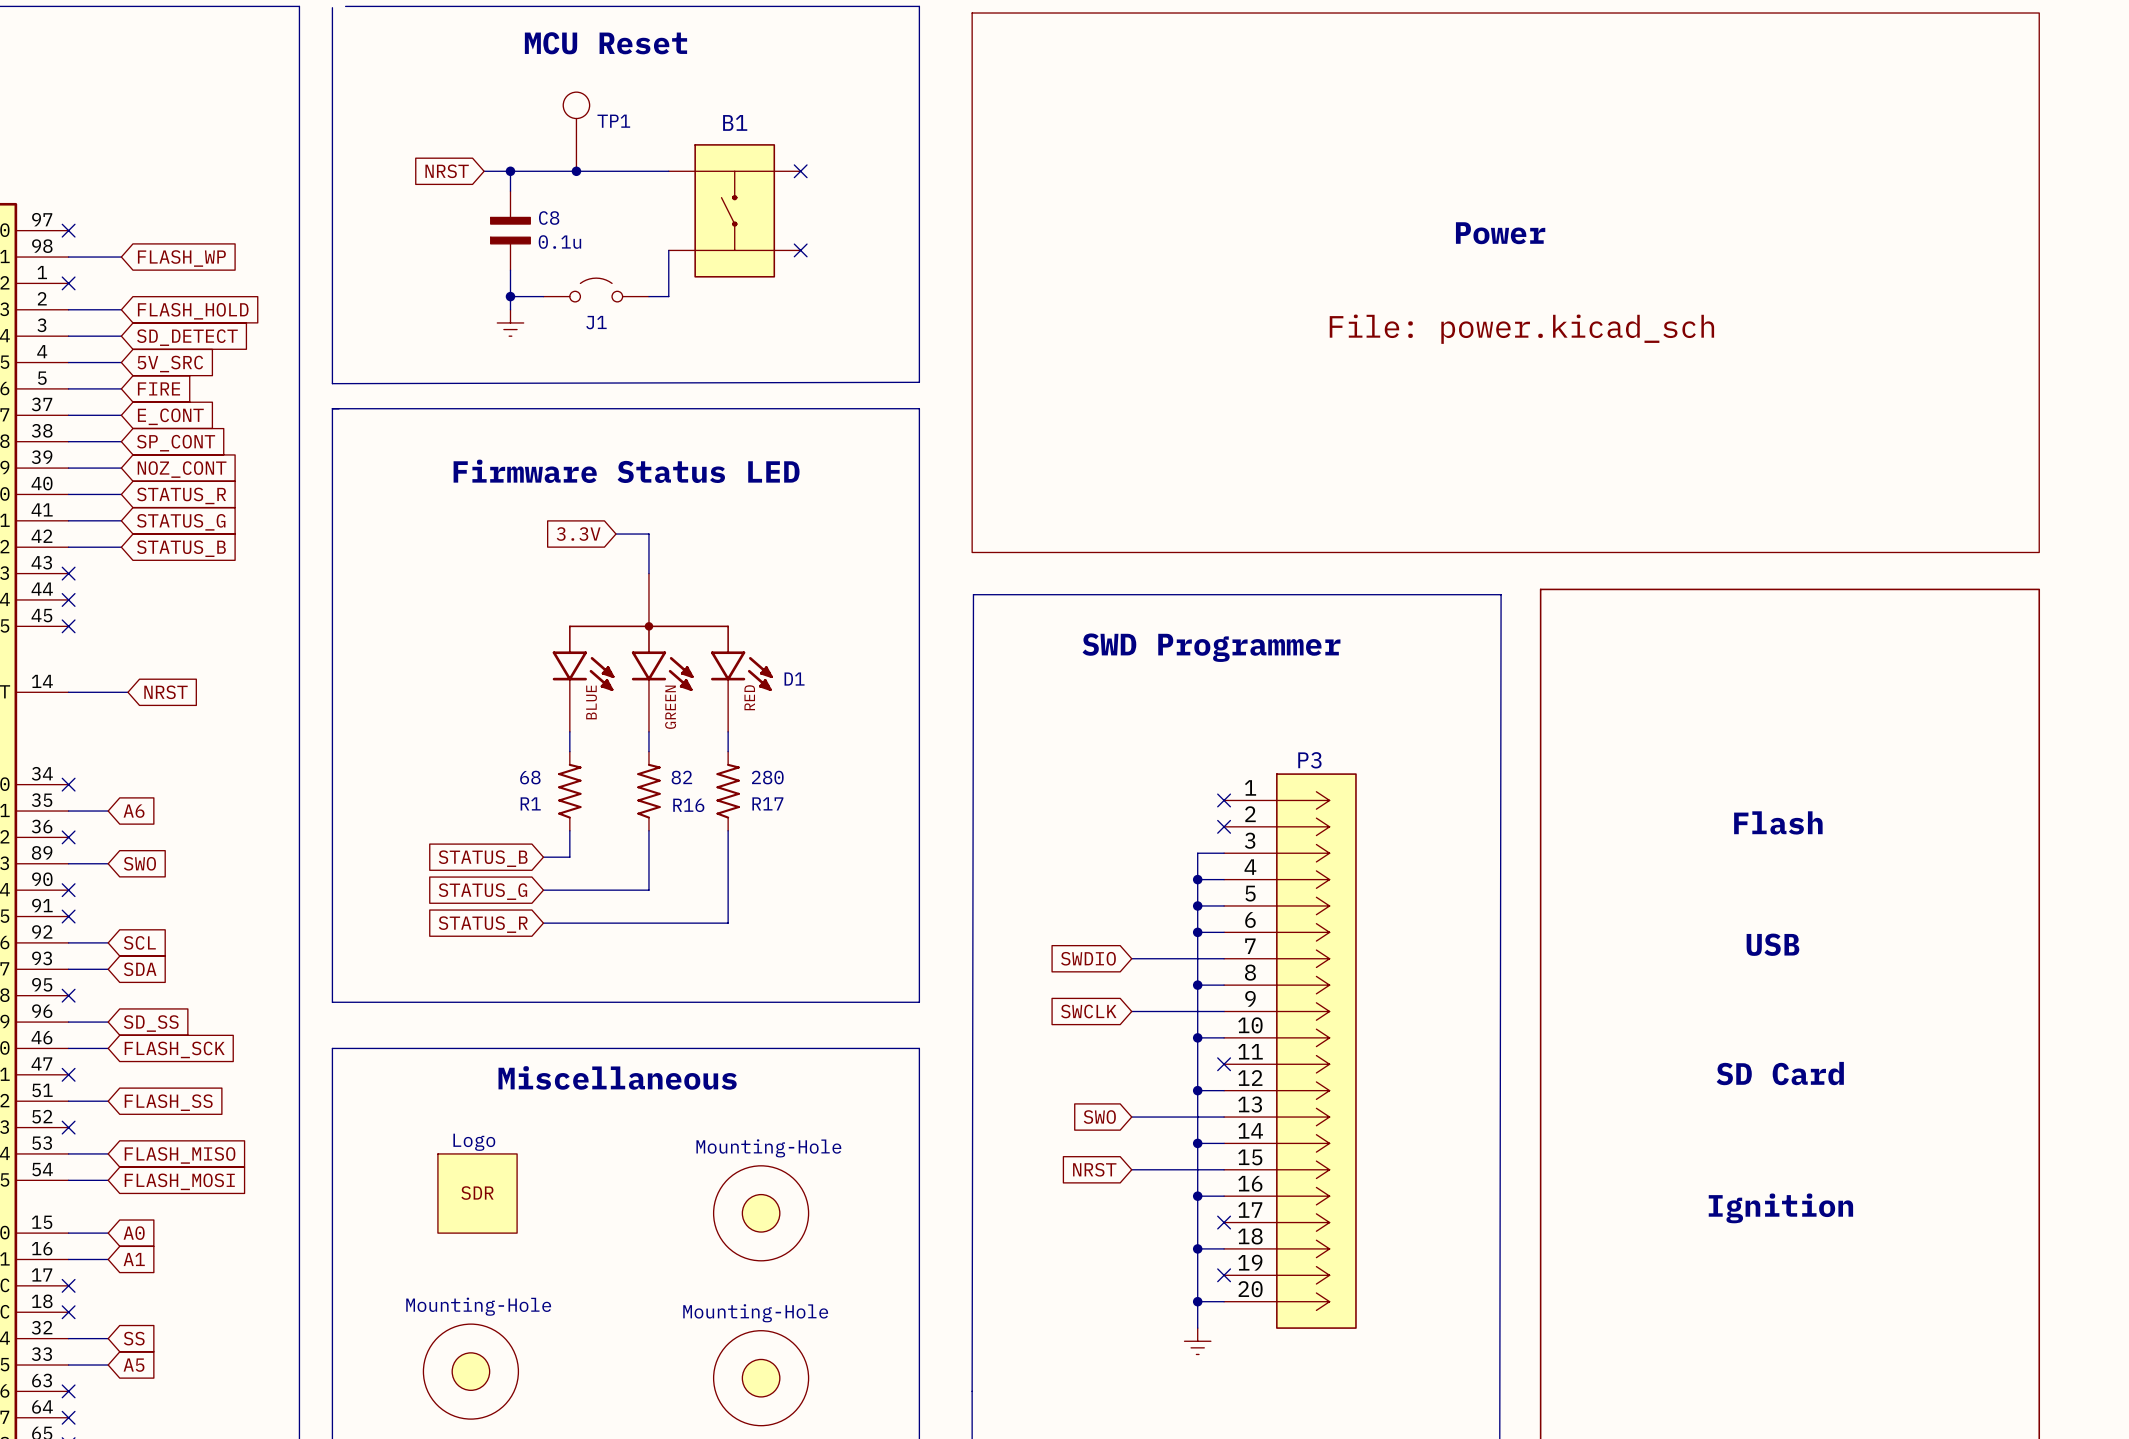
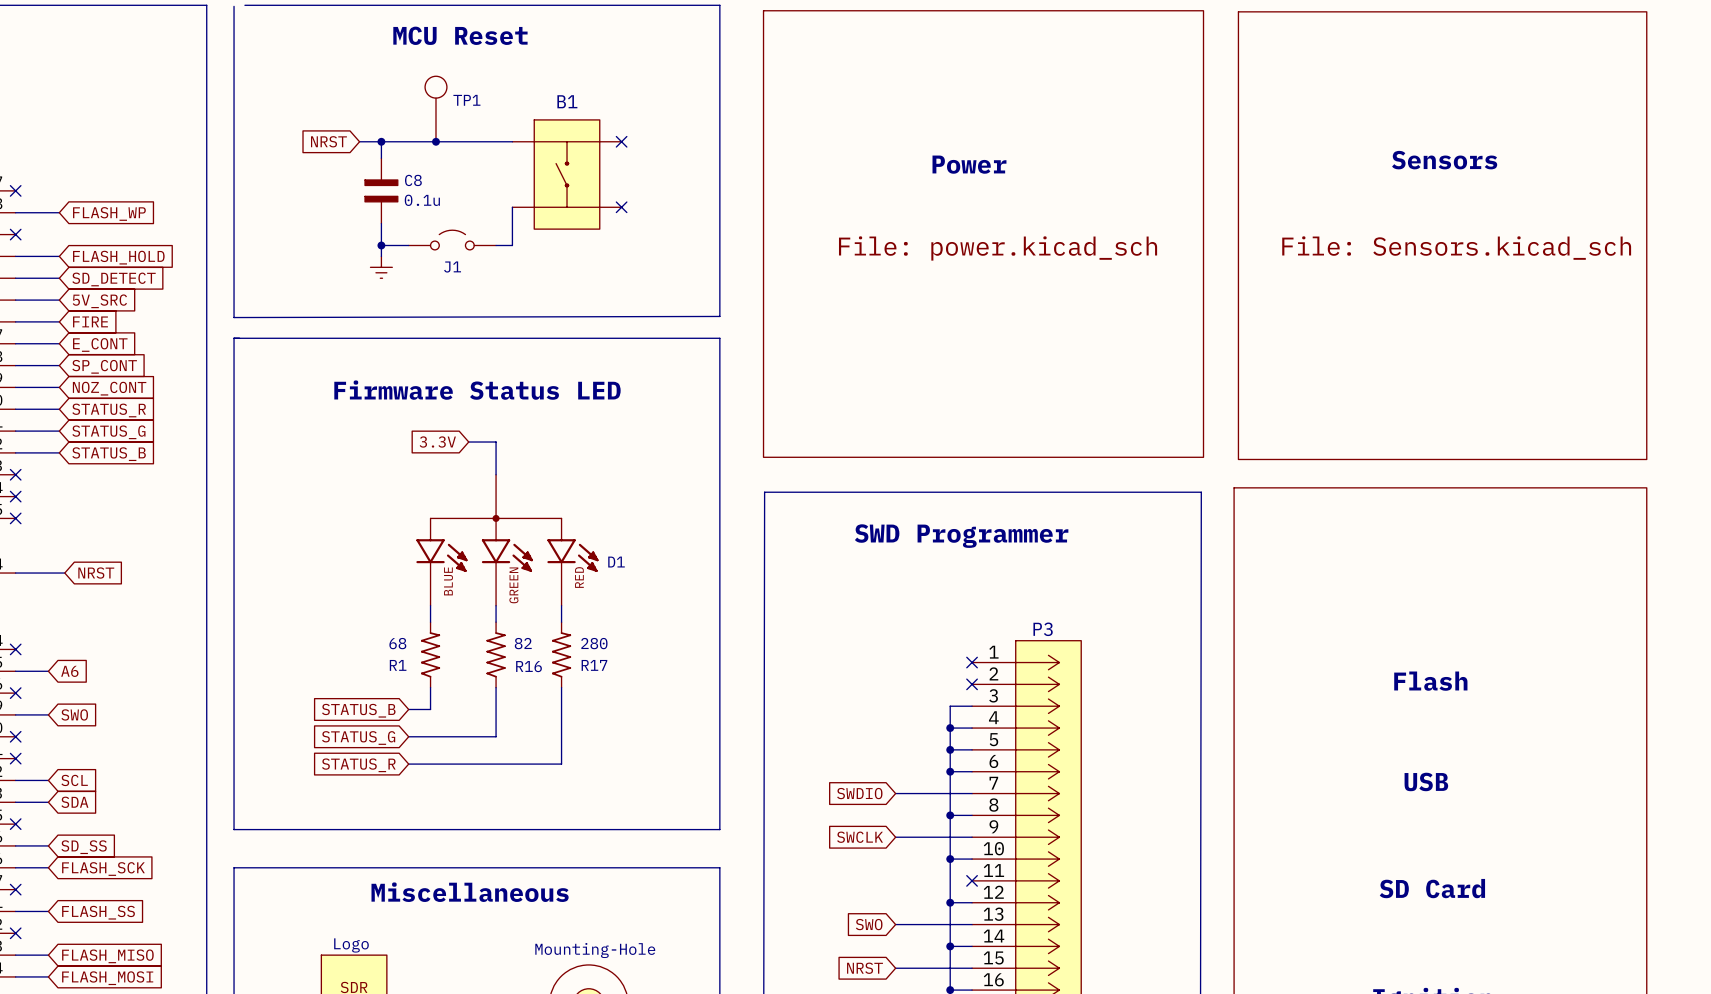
sheet Power: none -> File: power.kicad_sch (983, 234)
sheet Power: File: power.kicad_sch (1505, 282) -> none
sheet Sensors: none -> File: Sensors.kicad_sch (1442, 235)

